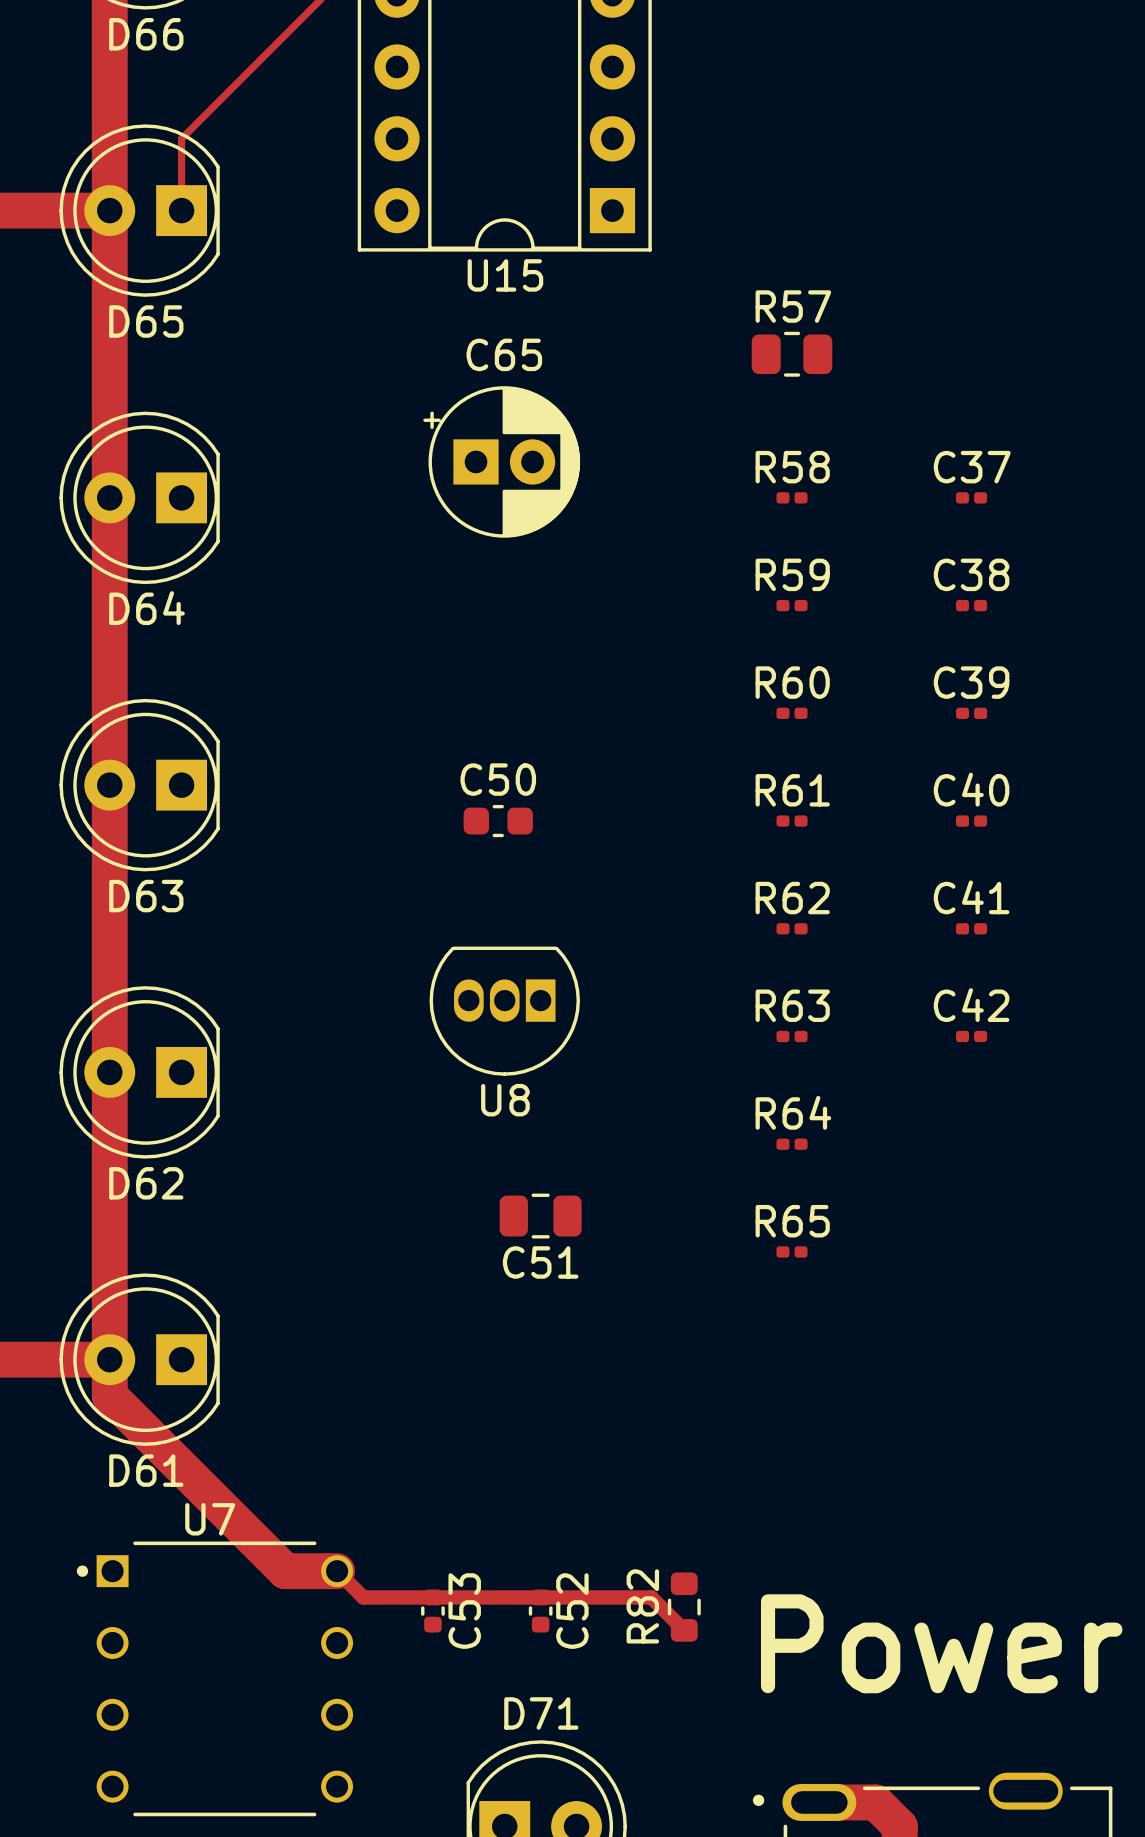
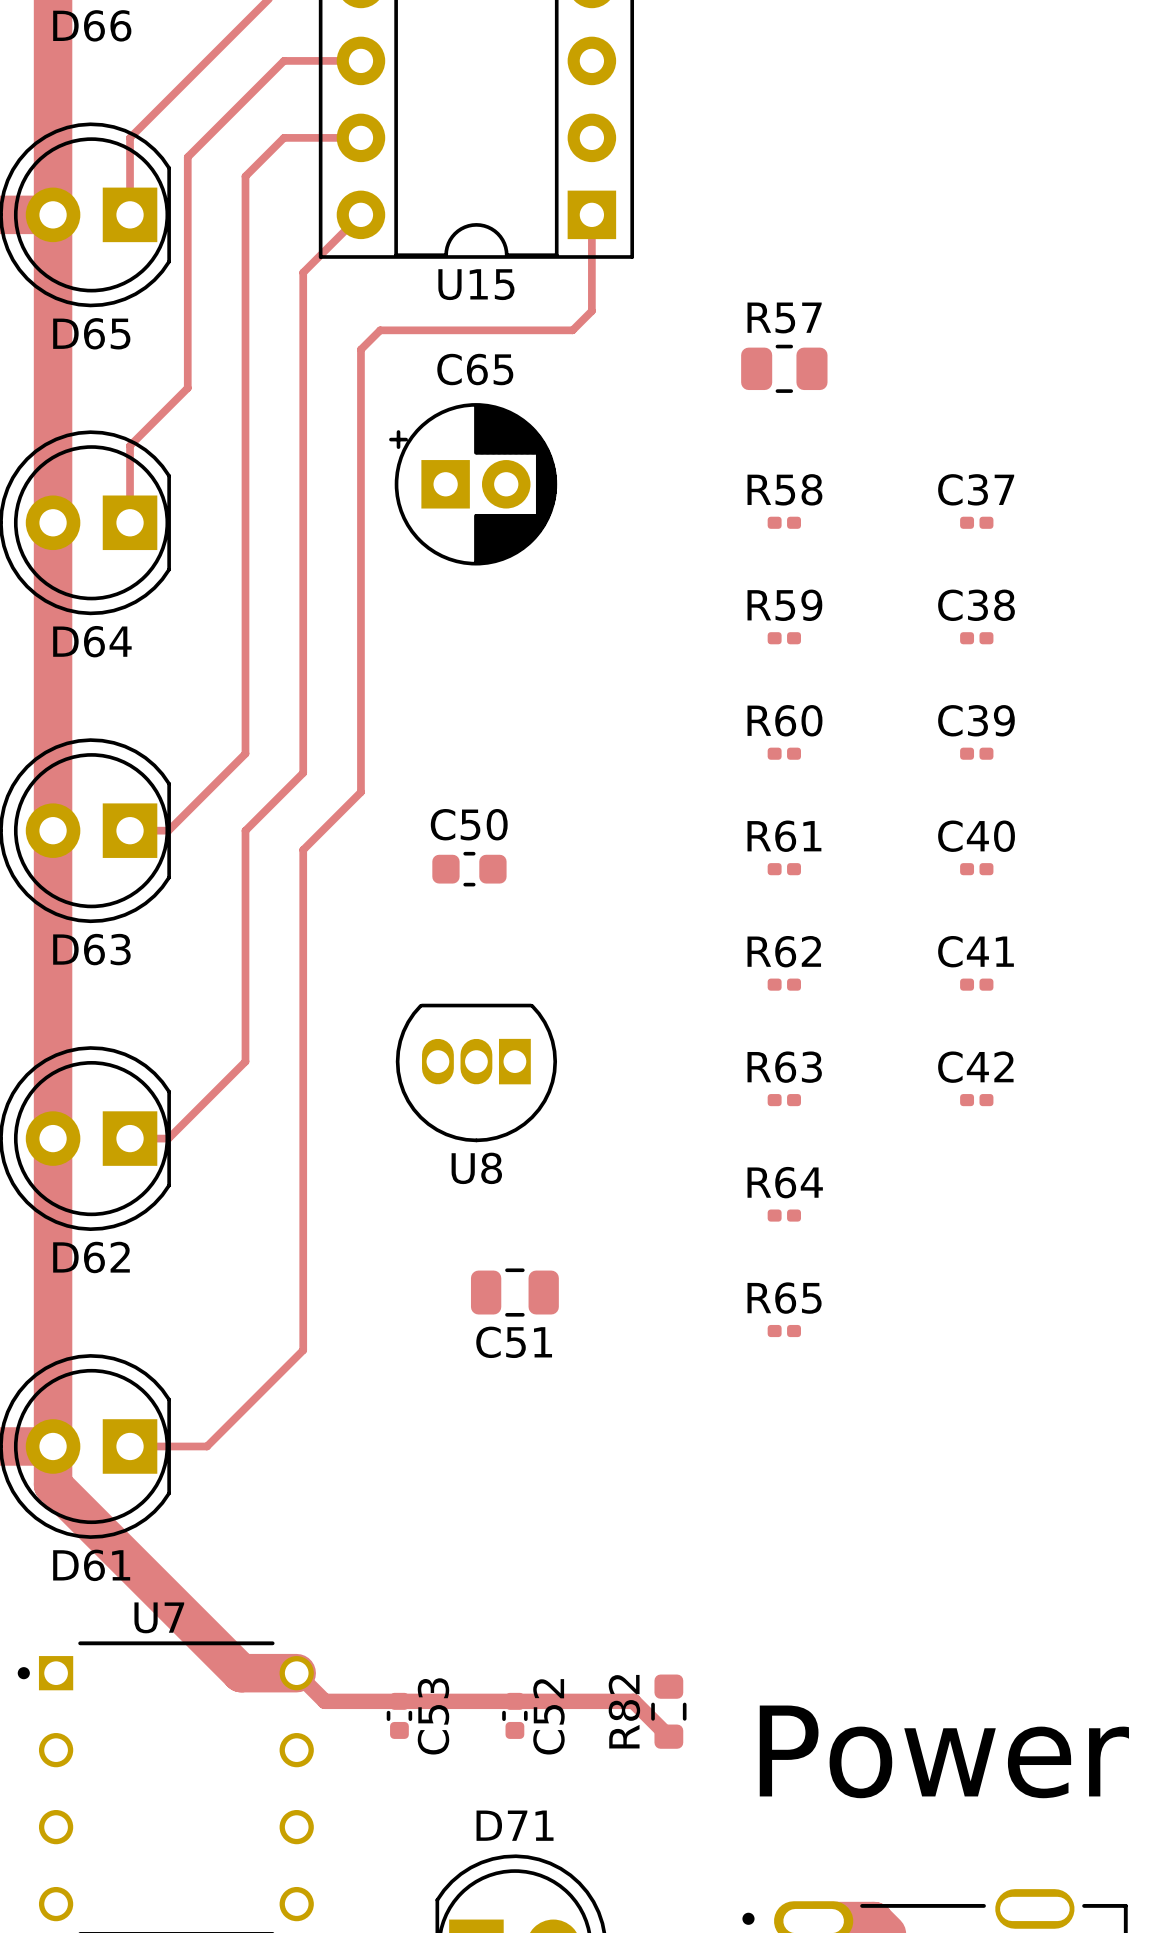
top track: none -> (360, 60) (283, 60) (187, 157) (187, 388) (130, 445) (130, 522)
top track: none -> (360, 137) (283, 137) (245, 176) (245, 753) (168, 830) (130, 830)
top track: none -> (360, 214) (303, 272) (303, 772) (245, 830) (245, 1061) (168, 1138) (130, 1138)
top track: none -> (591, 214) (591, 311) (572, 330) (380, 330) (360, 349) (360, 792) (303, 849) (303, 1350) (207, 1446) (130, 1446)

